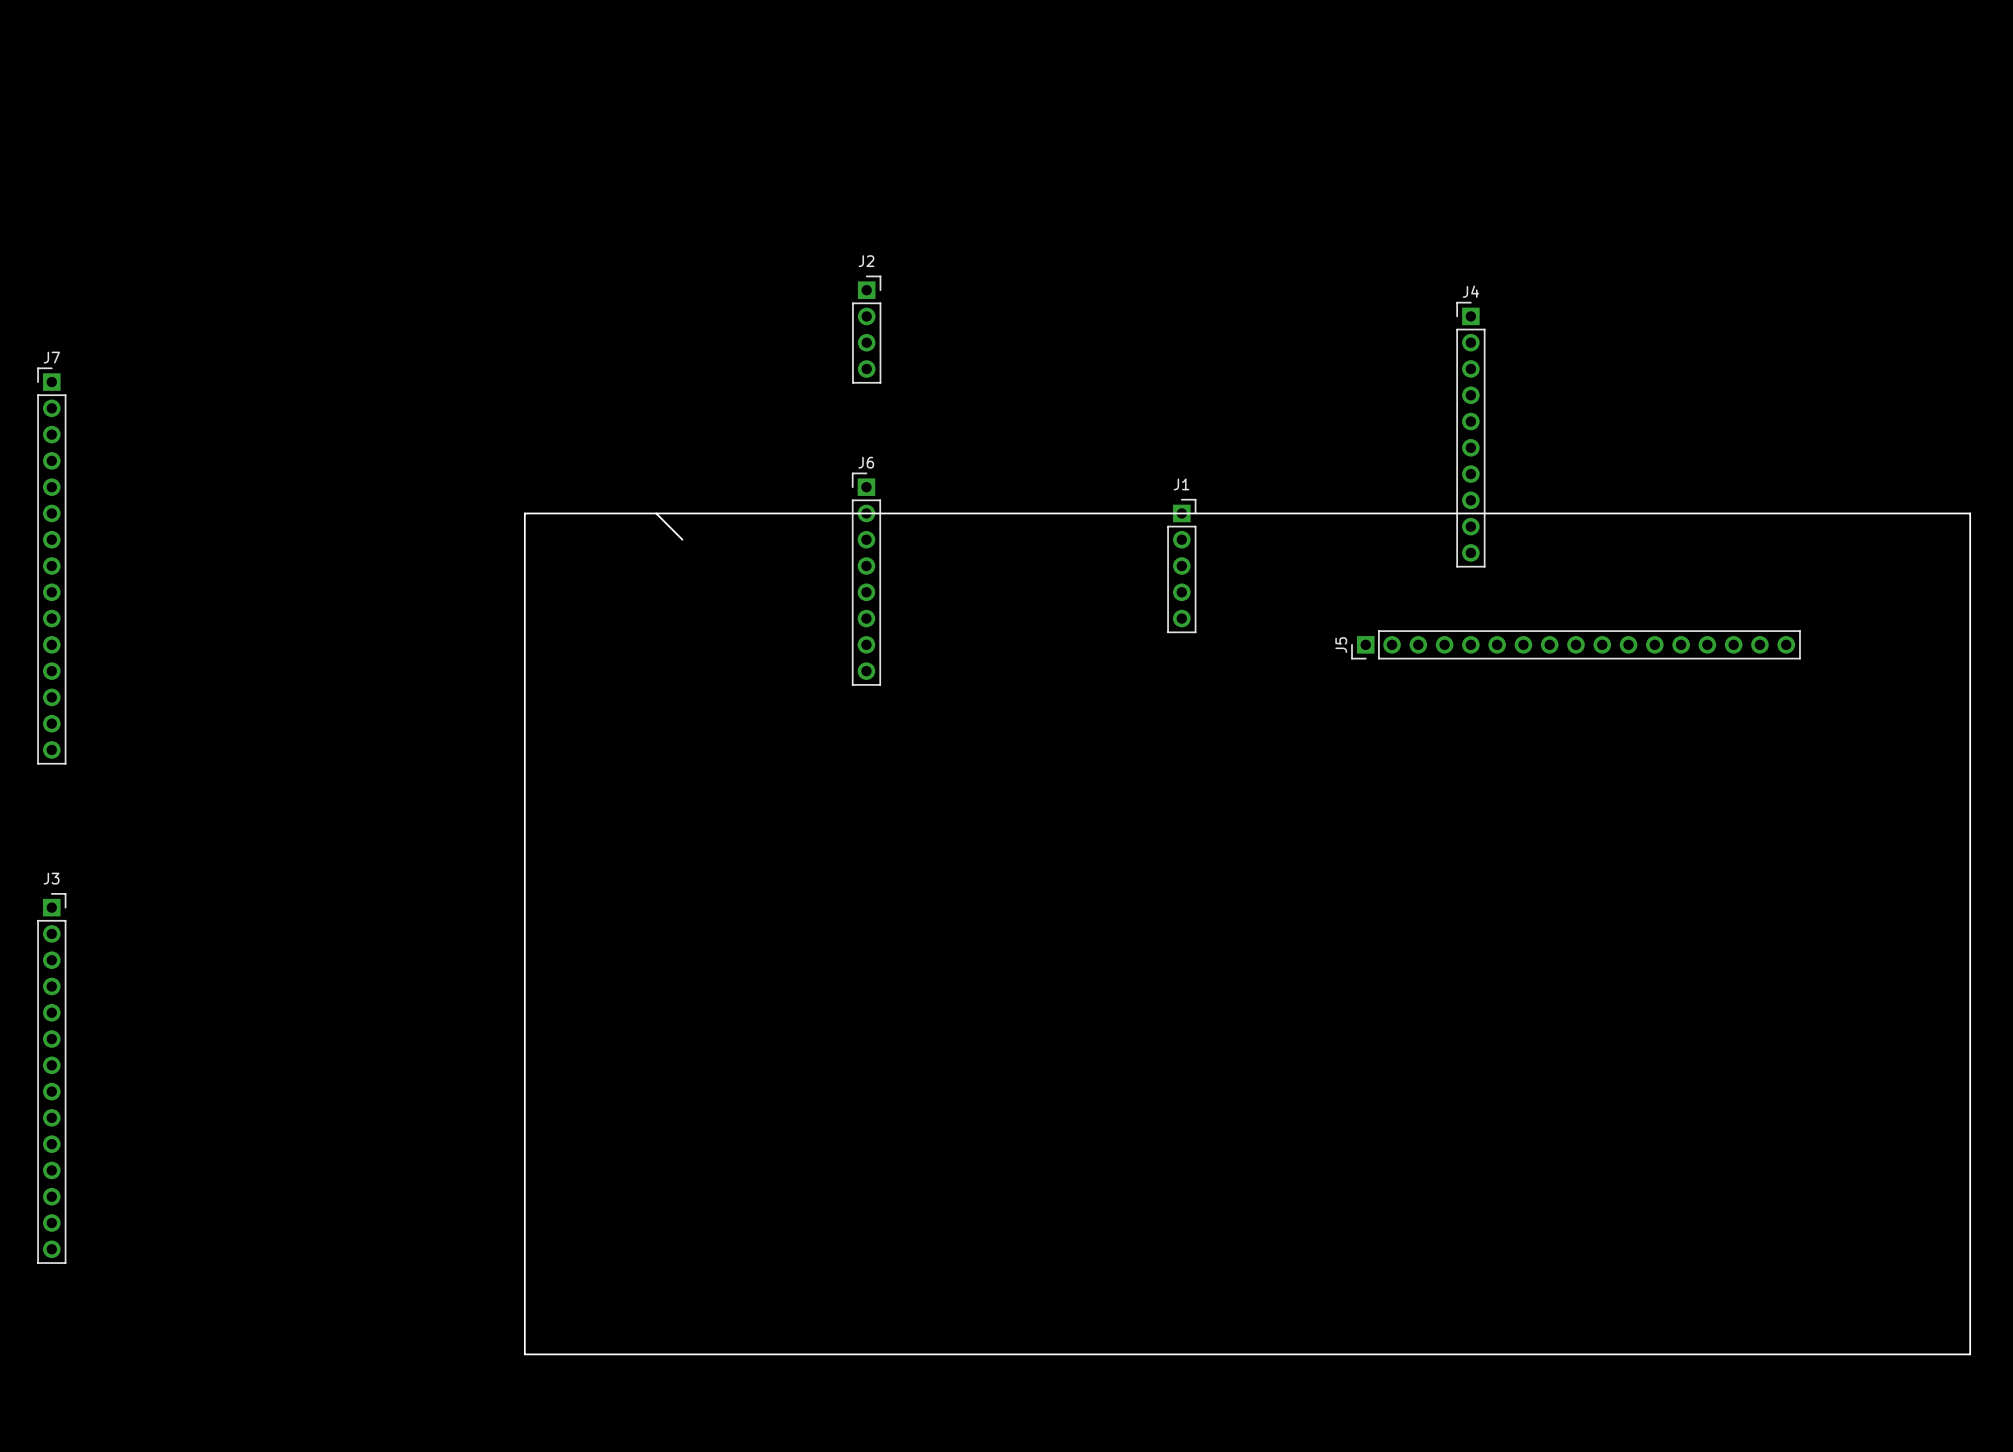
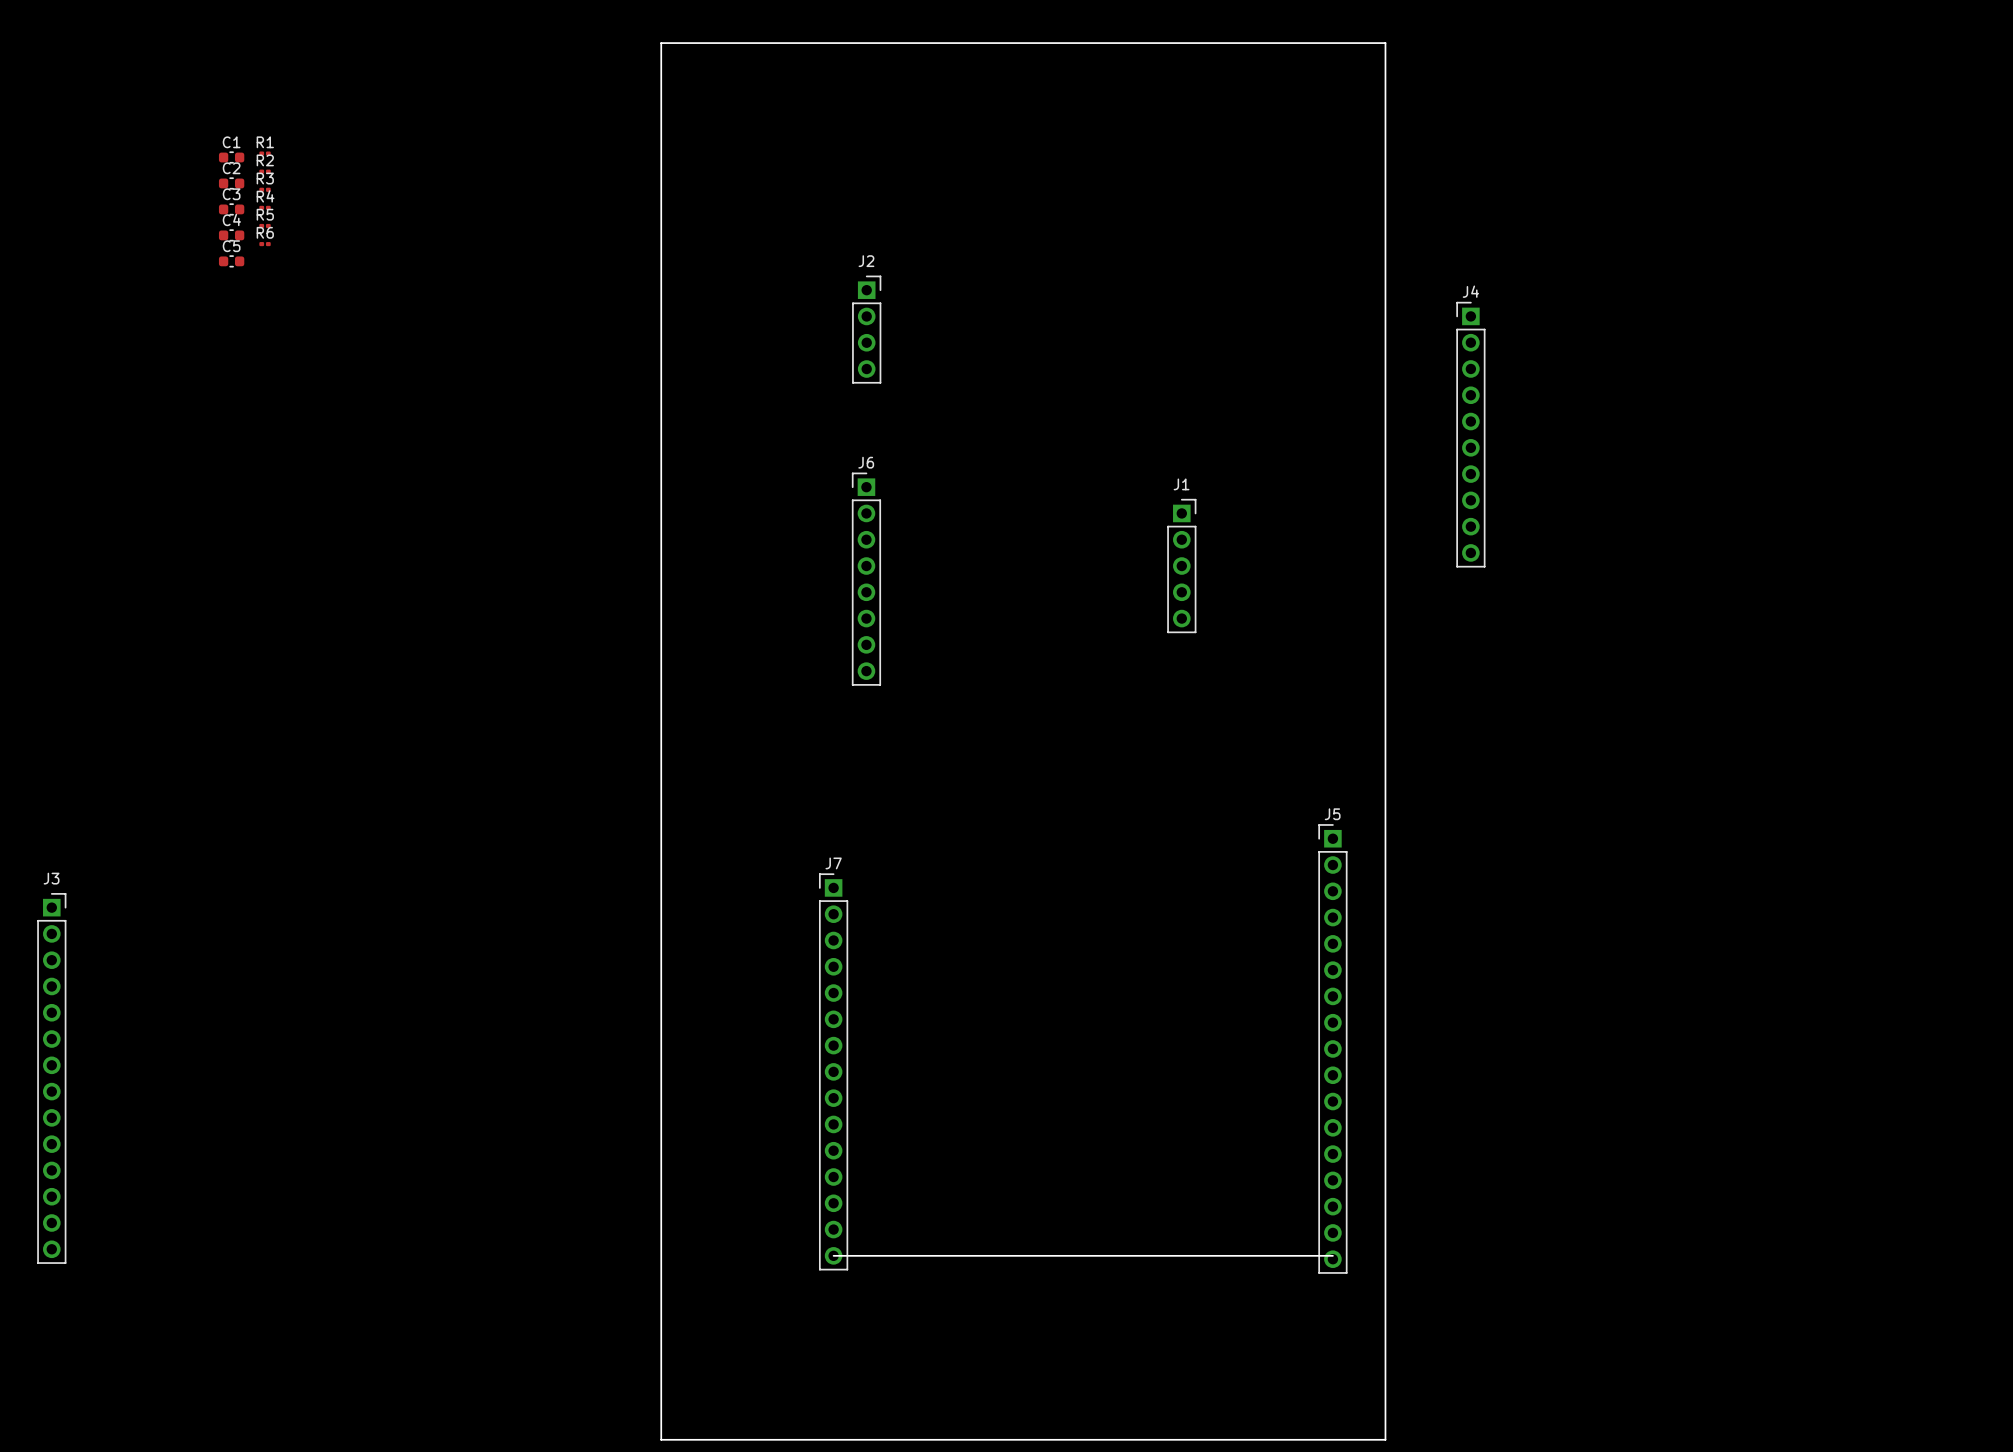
board edge: none -> (661, 43) (1385, 43) (1385, 1439) (661, 1439) (661, 43)
R1: none -> (265, 153)
C1: none -> (231, 157)
R2: none -> (265, 171)
C2: none -> (231, 183)
R3: none -> (265, 189)
R4: none -> (265, 207)
C3: none -> (231, 209)
R5: none -> (265, 225)
C4: none -> (231, 235)
R6: none -> (265, 244)
C5: none -> (231, 261)
board edge: (524, 513) (524, 1354) (1970, 1354) (1970, 513) (524, 513) -> none
board edge: (656, 513) (682, 539) -> none
J7 position: (51, 566) -> (833, 1071)
J5 rotation: 0° (1575, 644) -> 90° clockwise (1332, 1048)
J5 position: (1575, 644) -> (1332, 1048)
board edge: none -> (833, 1255) (1332, 1255)

